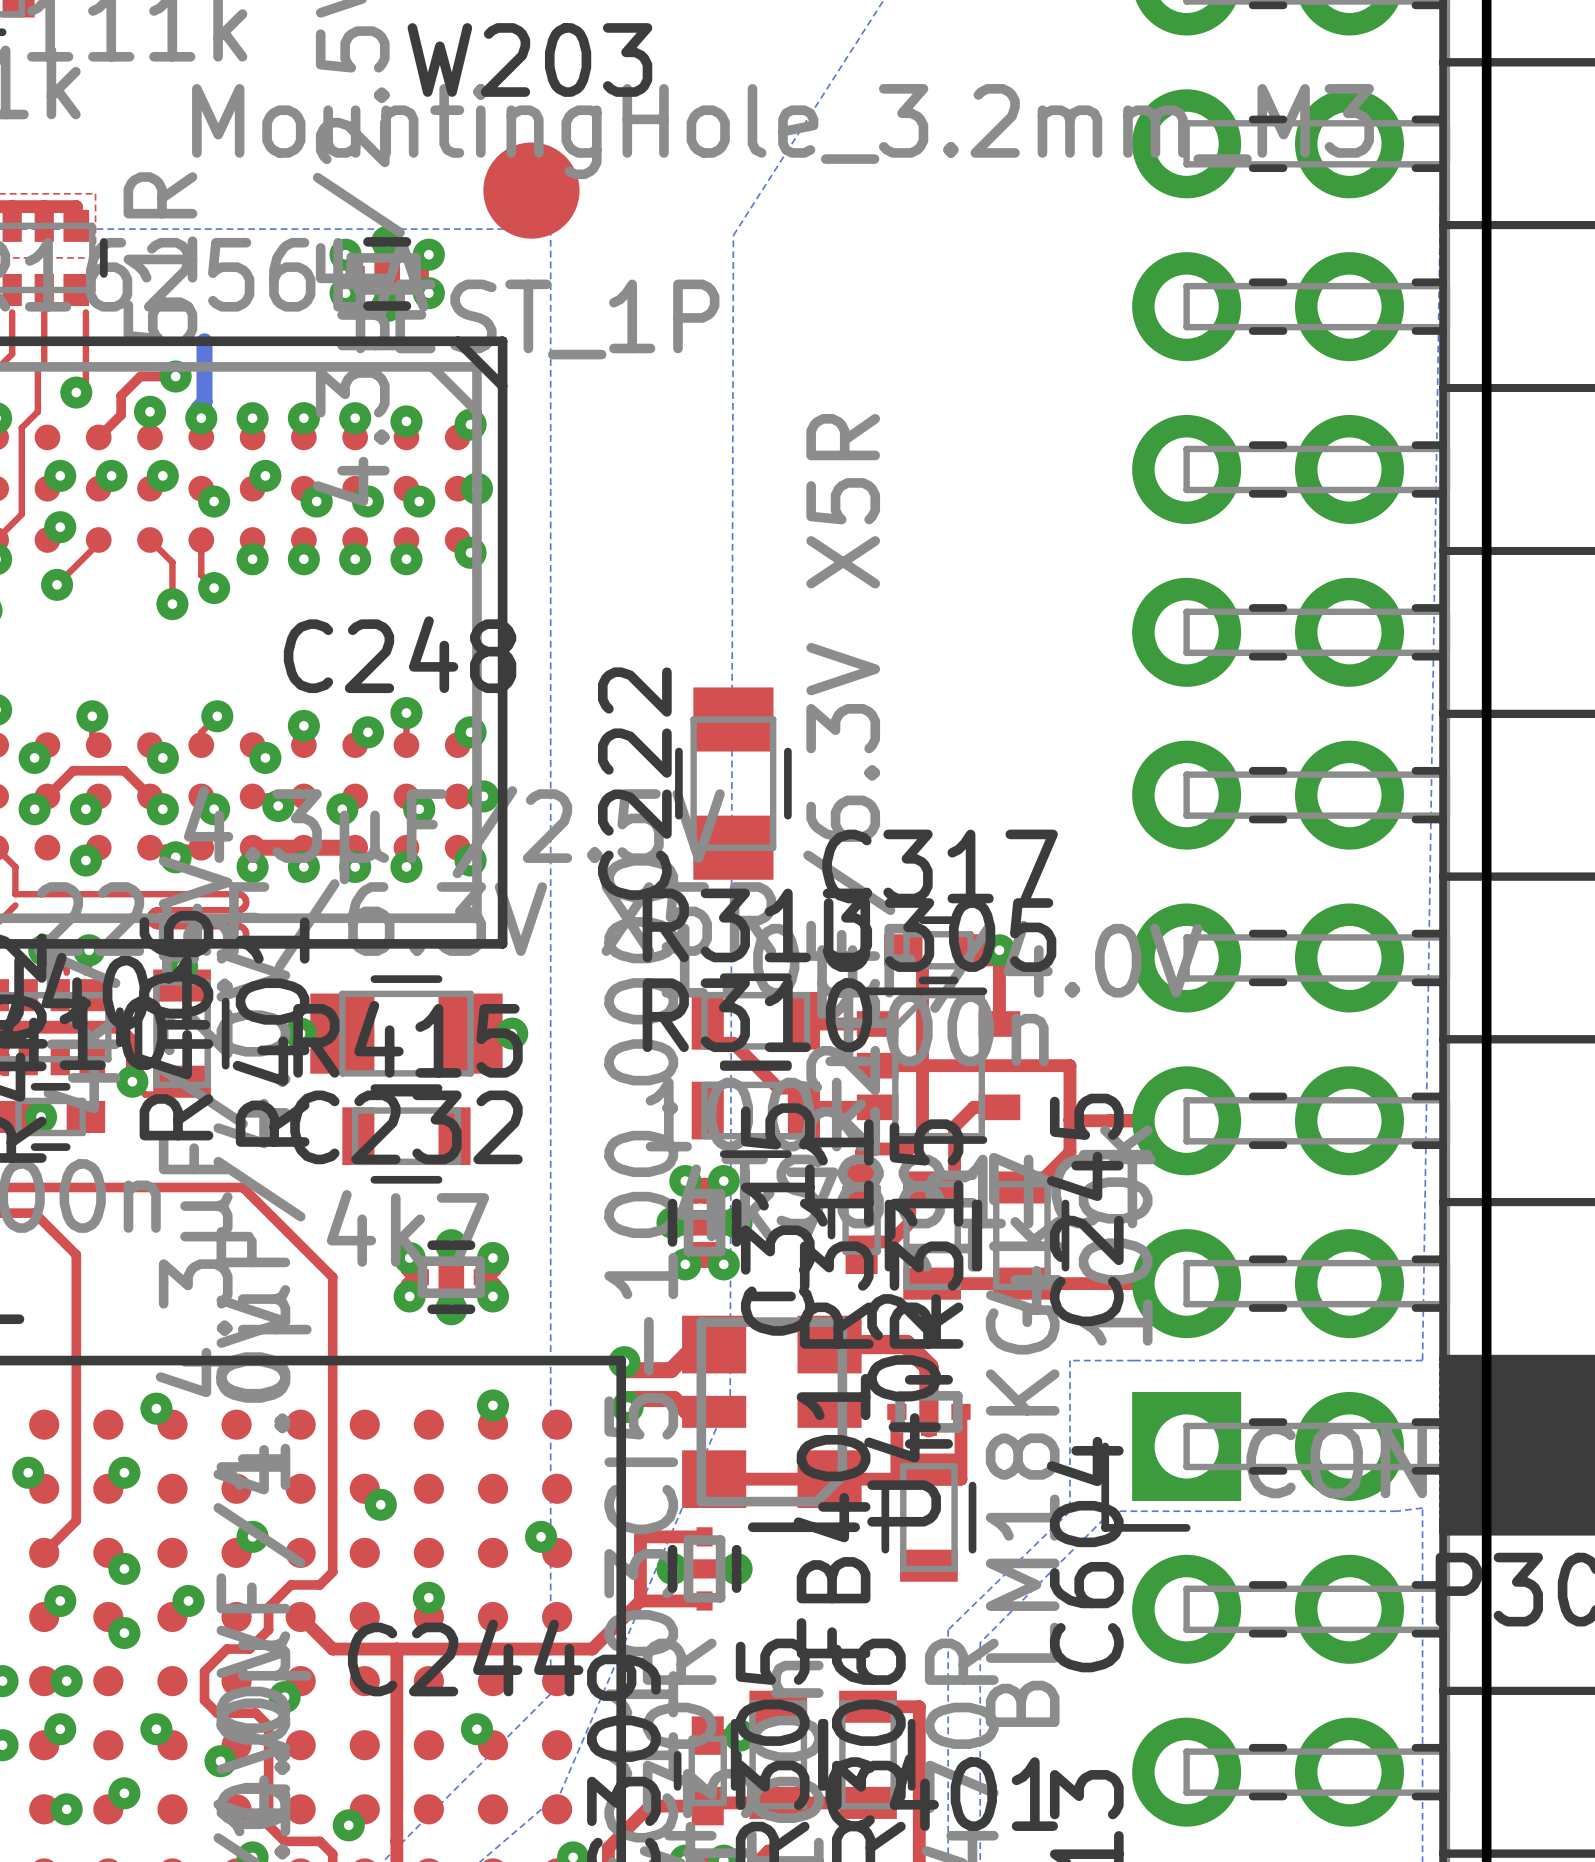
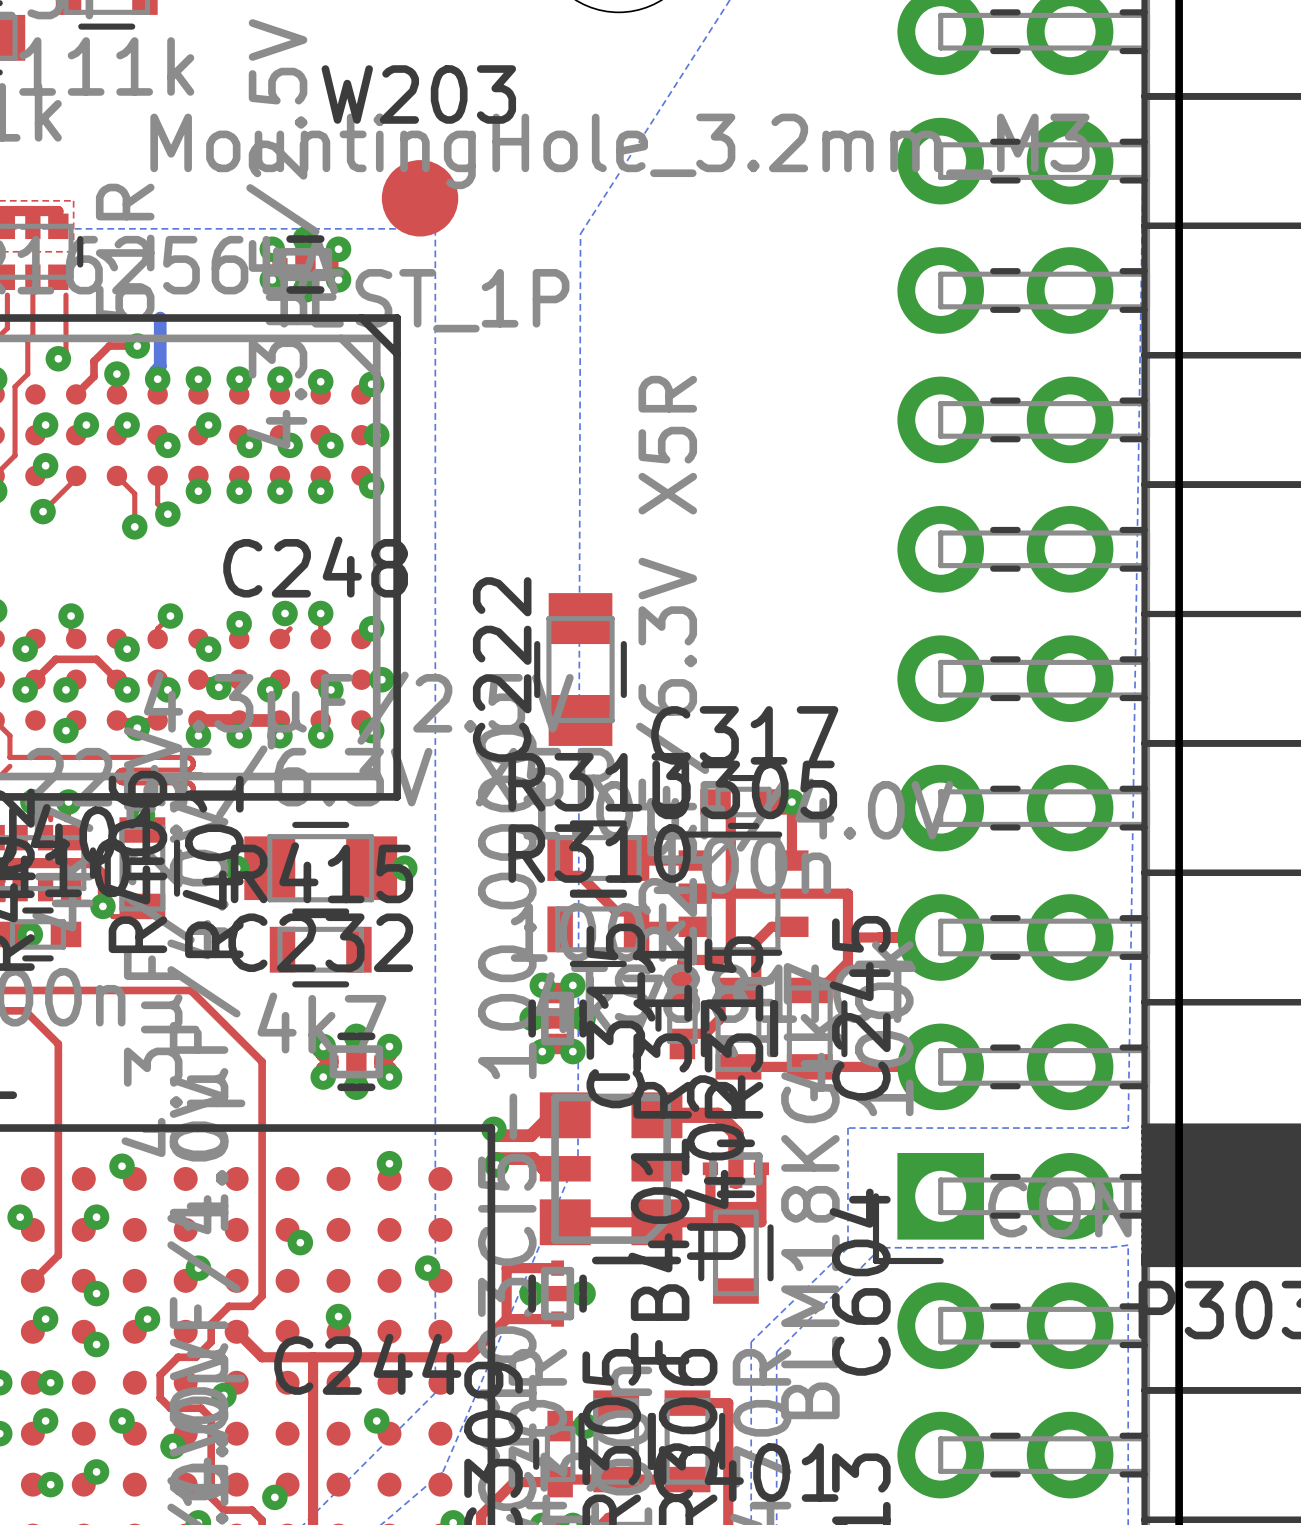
via position: (367, 732) -> (285, 613)

